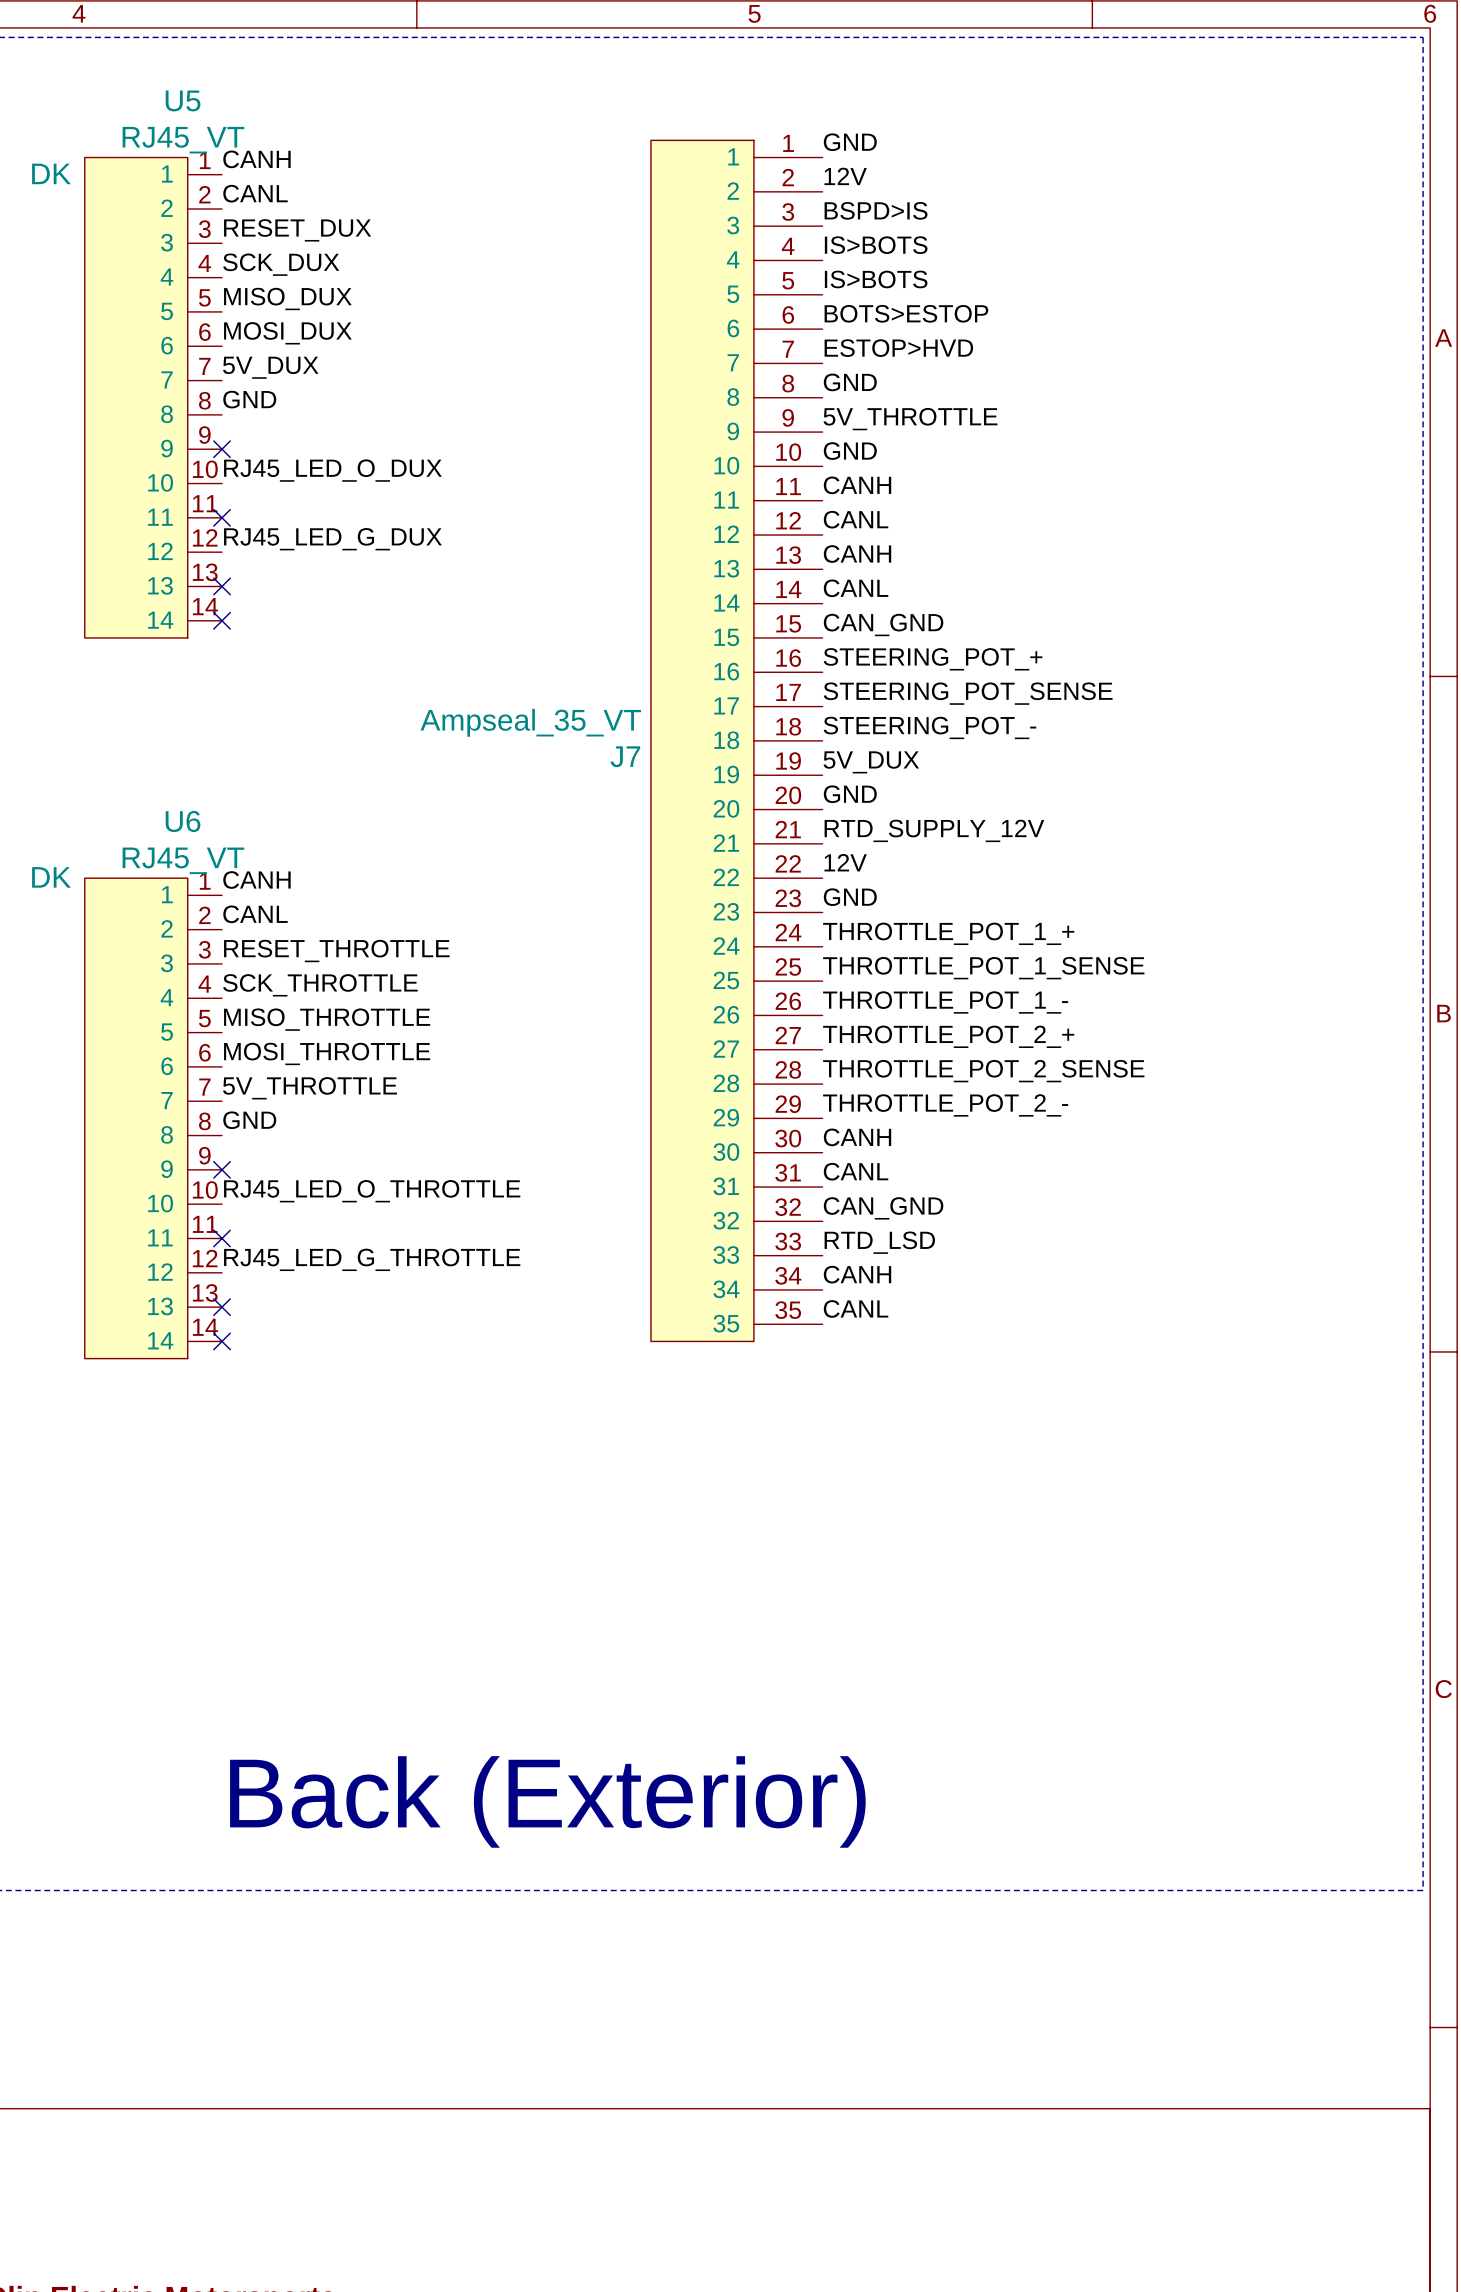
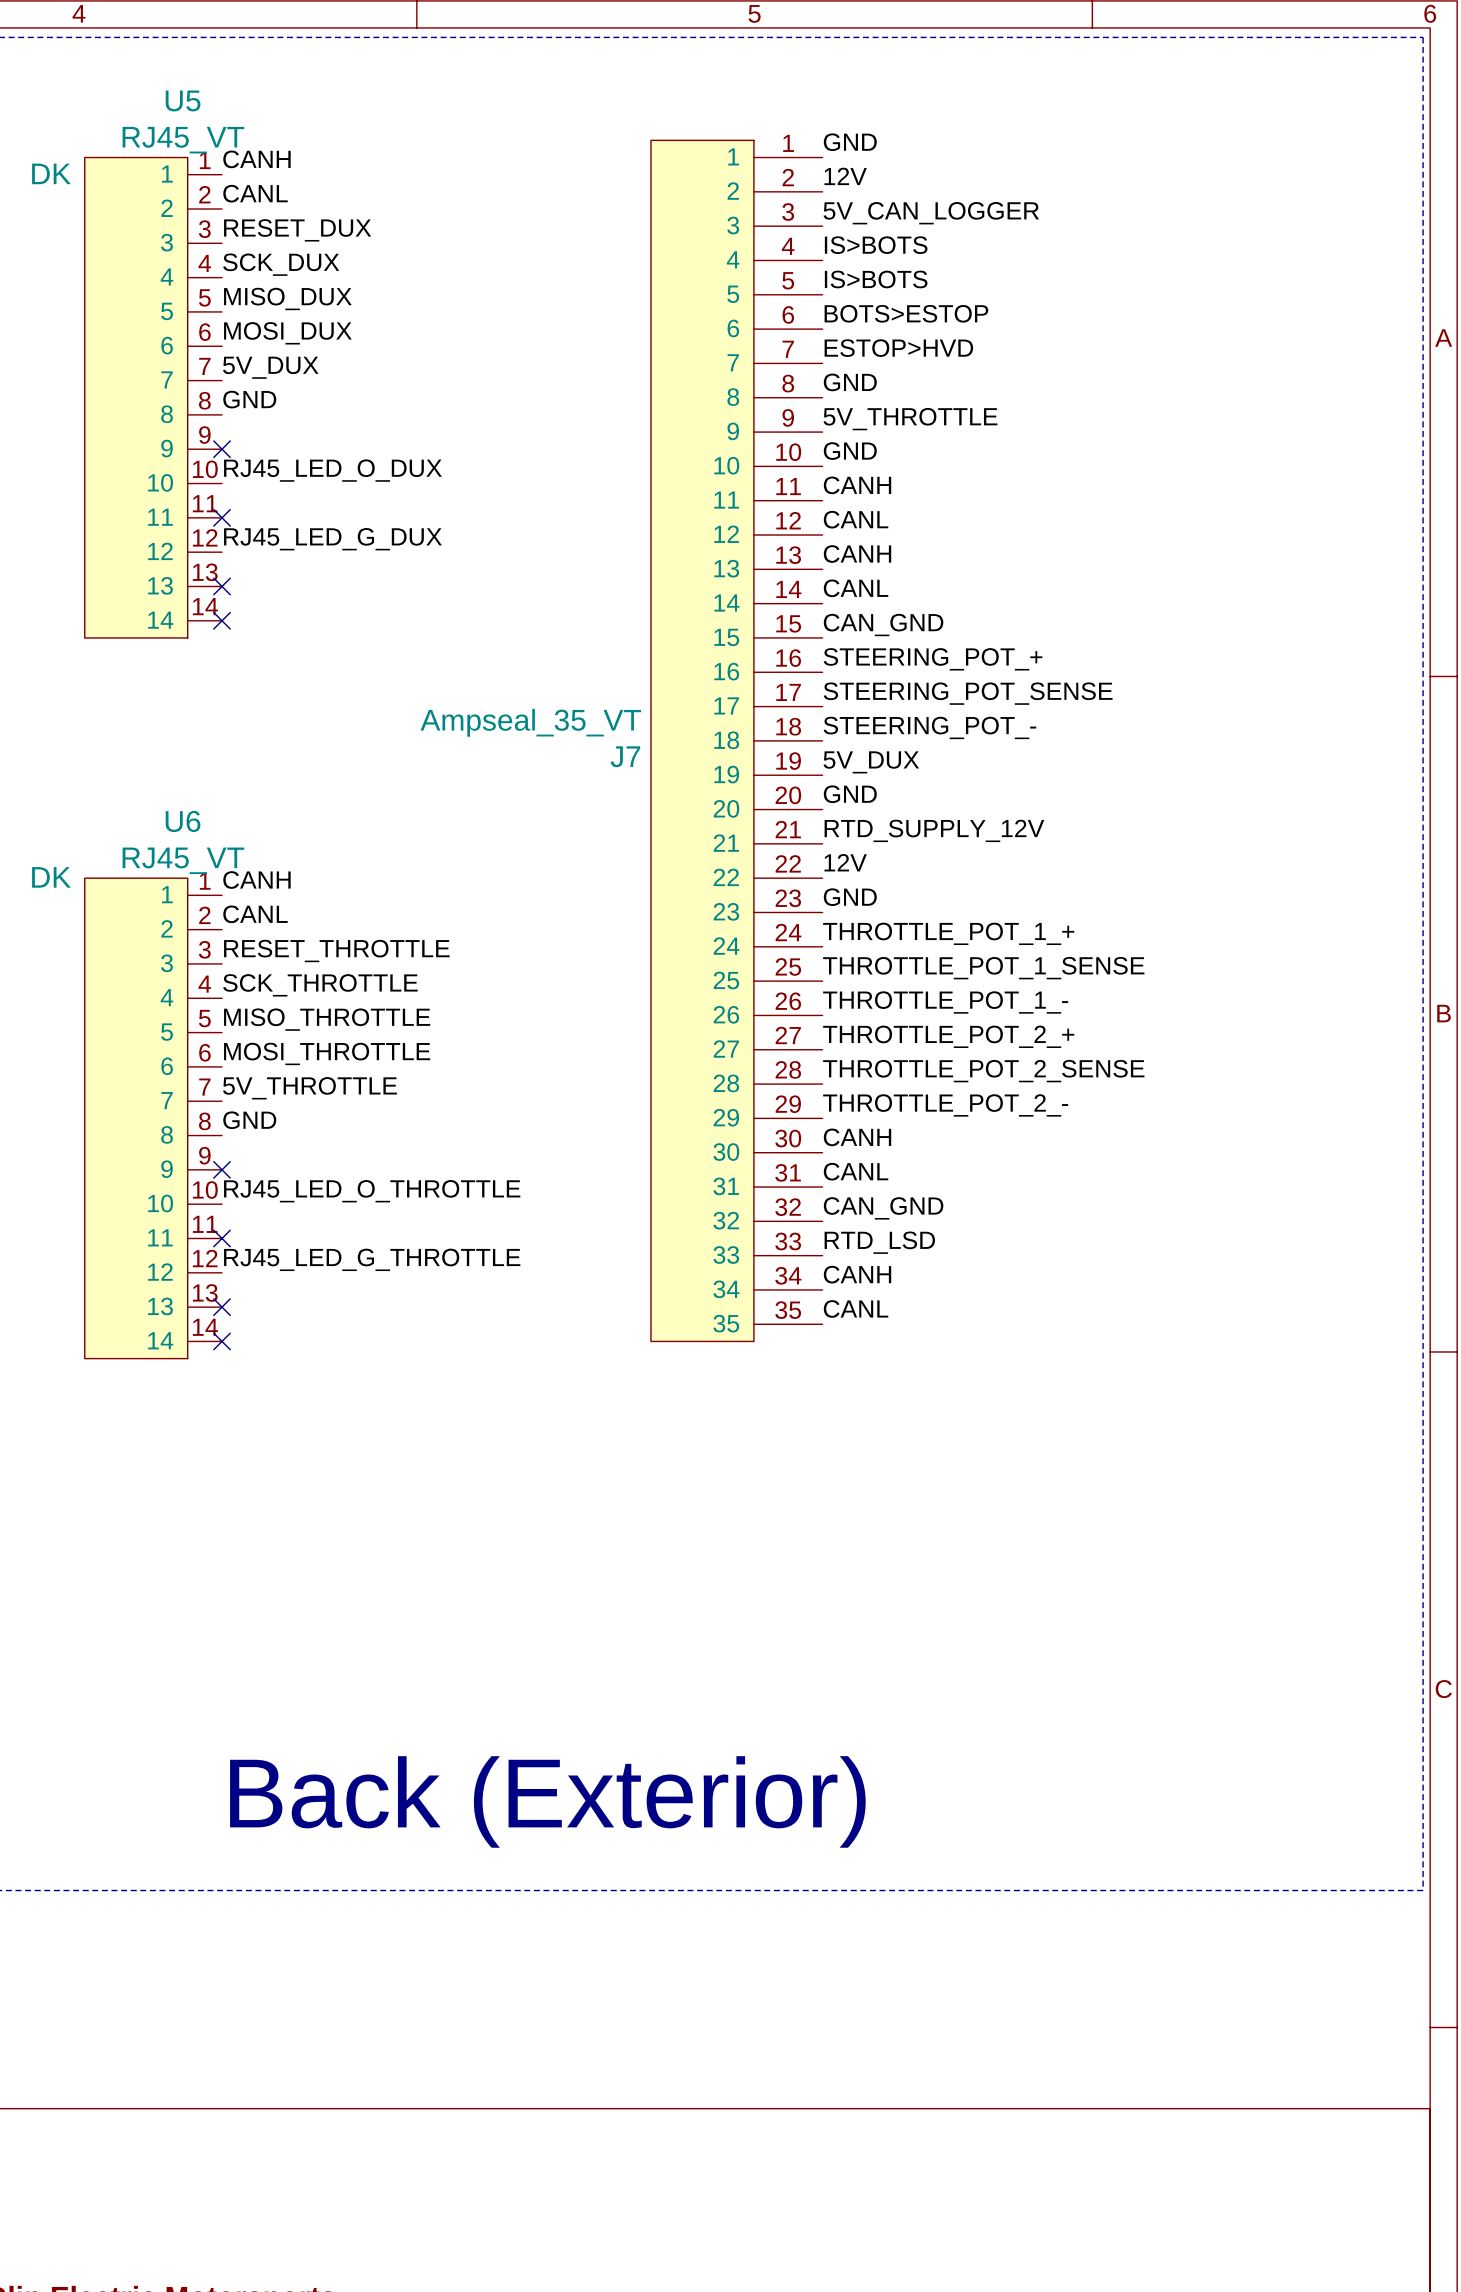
label: BSPD>IS (876, 210) -> 5V_CAN_LOGGER (931, 213)

